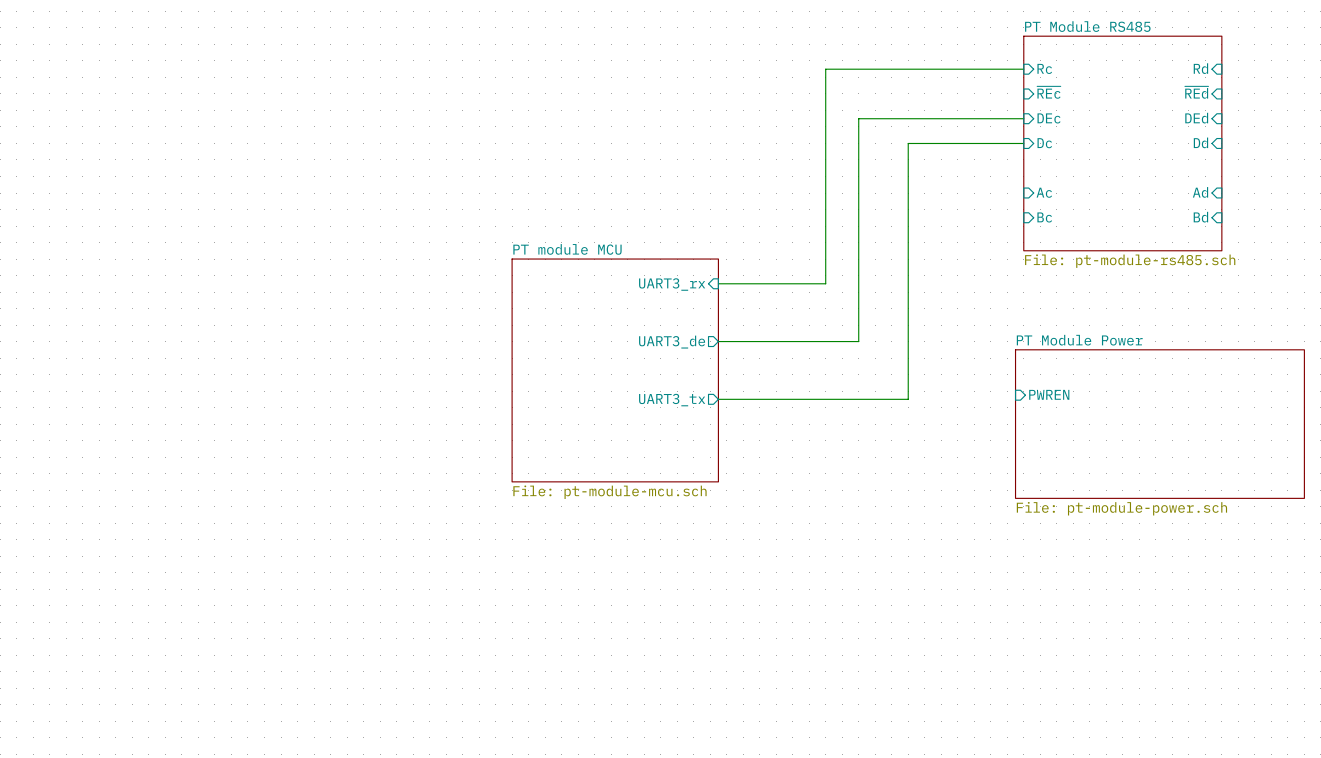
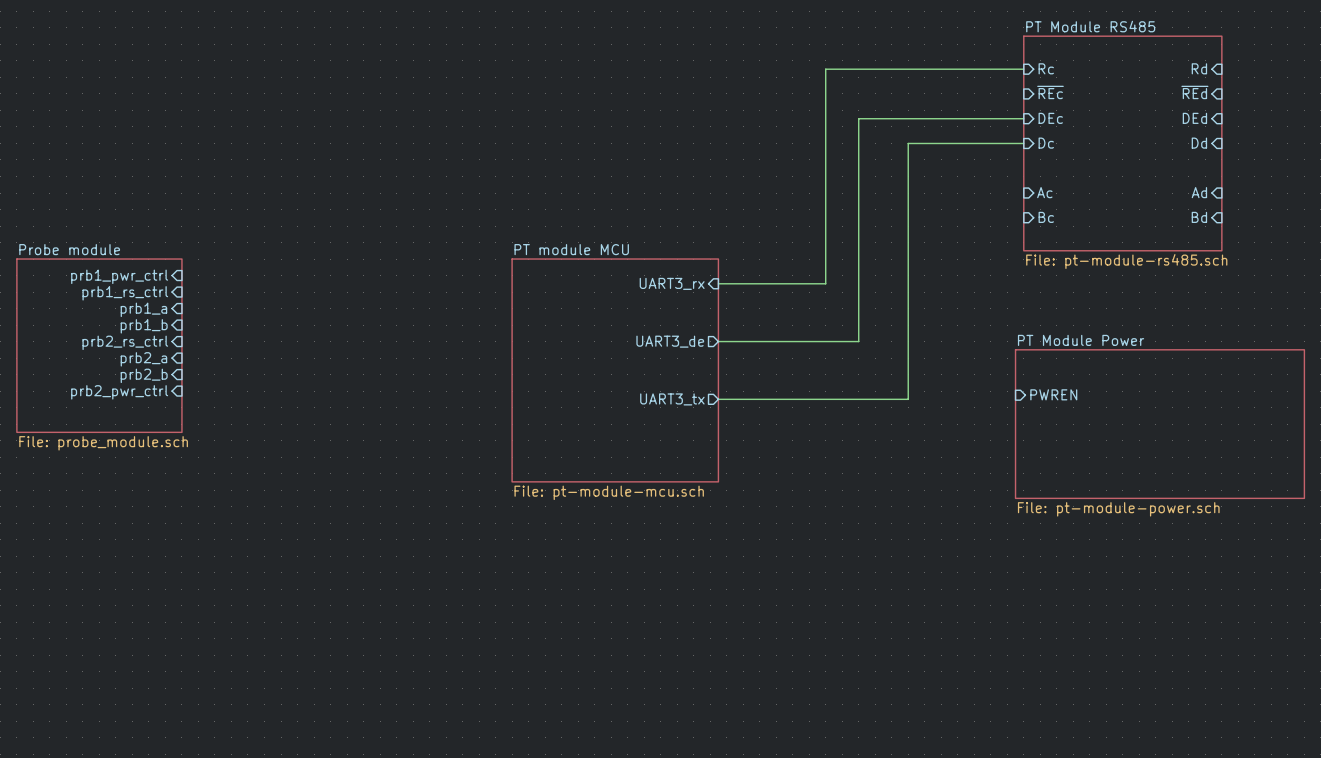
sheet pin: none -> prb1_pwr_ctrl (119, 276)
sheet pin: none -> prb1_rs_ctrl (125, 293)
sheet pin: none -> prb1_a (143, 309)
sheet pin: none -> prb1_b (144, 326)
sheet pin: none -> prb2_rs_ctrl (125, 342)
sheet Probe module: none -> File: probe_module.sch (99, 345)
sheet pin: none -> prb2_a (143, 359)
sheet pin: none -> prb2_b (144, 375)
sheet pin: none -> prb2_pwr_ctrl (119, 392)

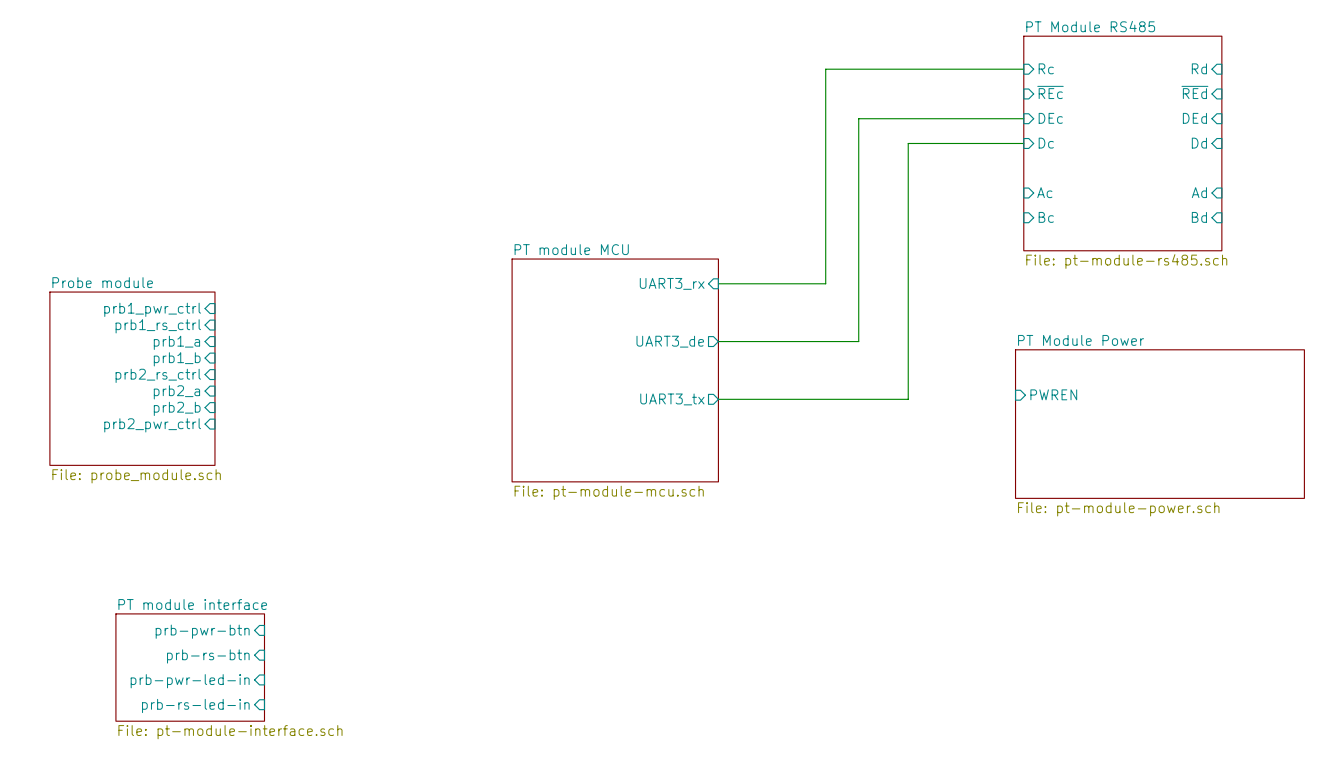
sheet pin position: prb1_pwr_ctrl (119, 276) -> prb1_pwr_ctrl (152, 309)
sheet pin position: prb1_rs_ctrl (125, 293) -> prb1_rs_ctrl (158, 326)
sheet pin position: prb1_a (143, 309) -> prb1_a (176, 342)
sheet pin position: prb1_b (144, 326) -> prb1_b (177, 359)
sheet pin position: prb2_rs_ctrl (125, 342) -> prb2_rs_ctrl (158, 375)
sheet Probe module position: (99, 345) -> (132, 378)
sheet pin position: prb2_a (143, 359) -> prb2_a (176, 392)
sheet pin position: prb2_b (144, 375) -> prb2_b (177, 408)
sheet pin position: prb2_pwr_ctrl (119, 392) -> prb2_pwr_ctrl (152, 425)
sheet pin: none -> prb-pwr-btn (202, 631)
sheet pin: none -> prb-rs-btn (208, 656)
sheet PT module interface: none -> File: pt-module-interface.sch (190, 667)
sheet pin: none -> prb-pwr-led-in (190, 681)
sheet pin: none -> prb-rs-led-in (195, 705)

